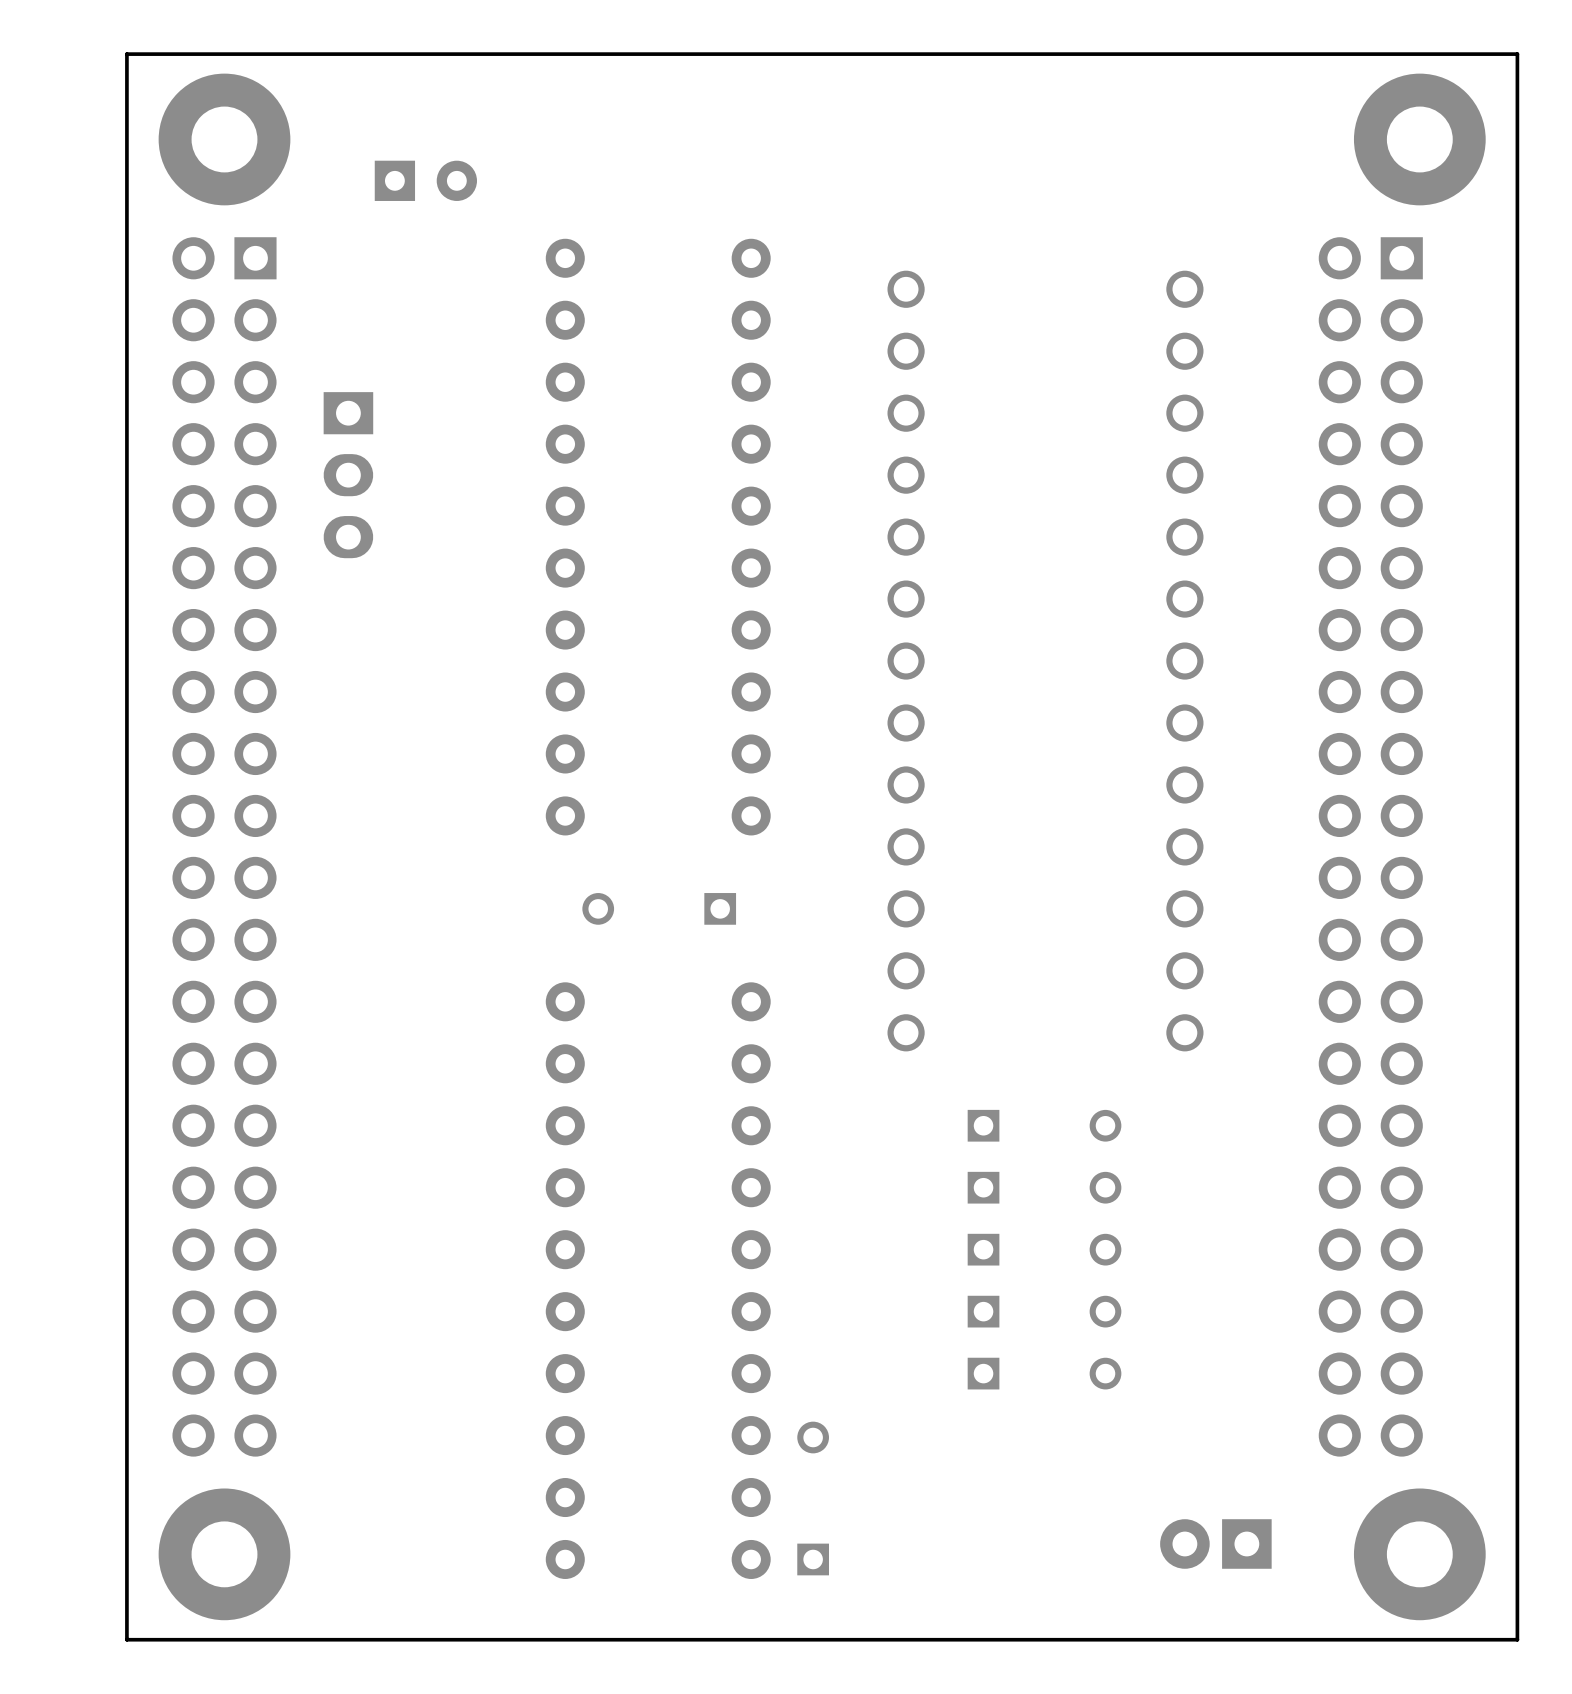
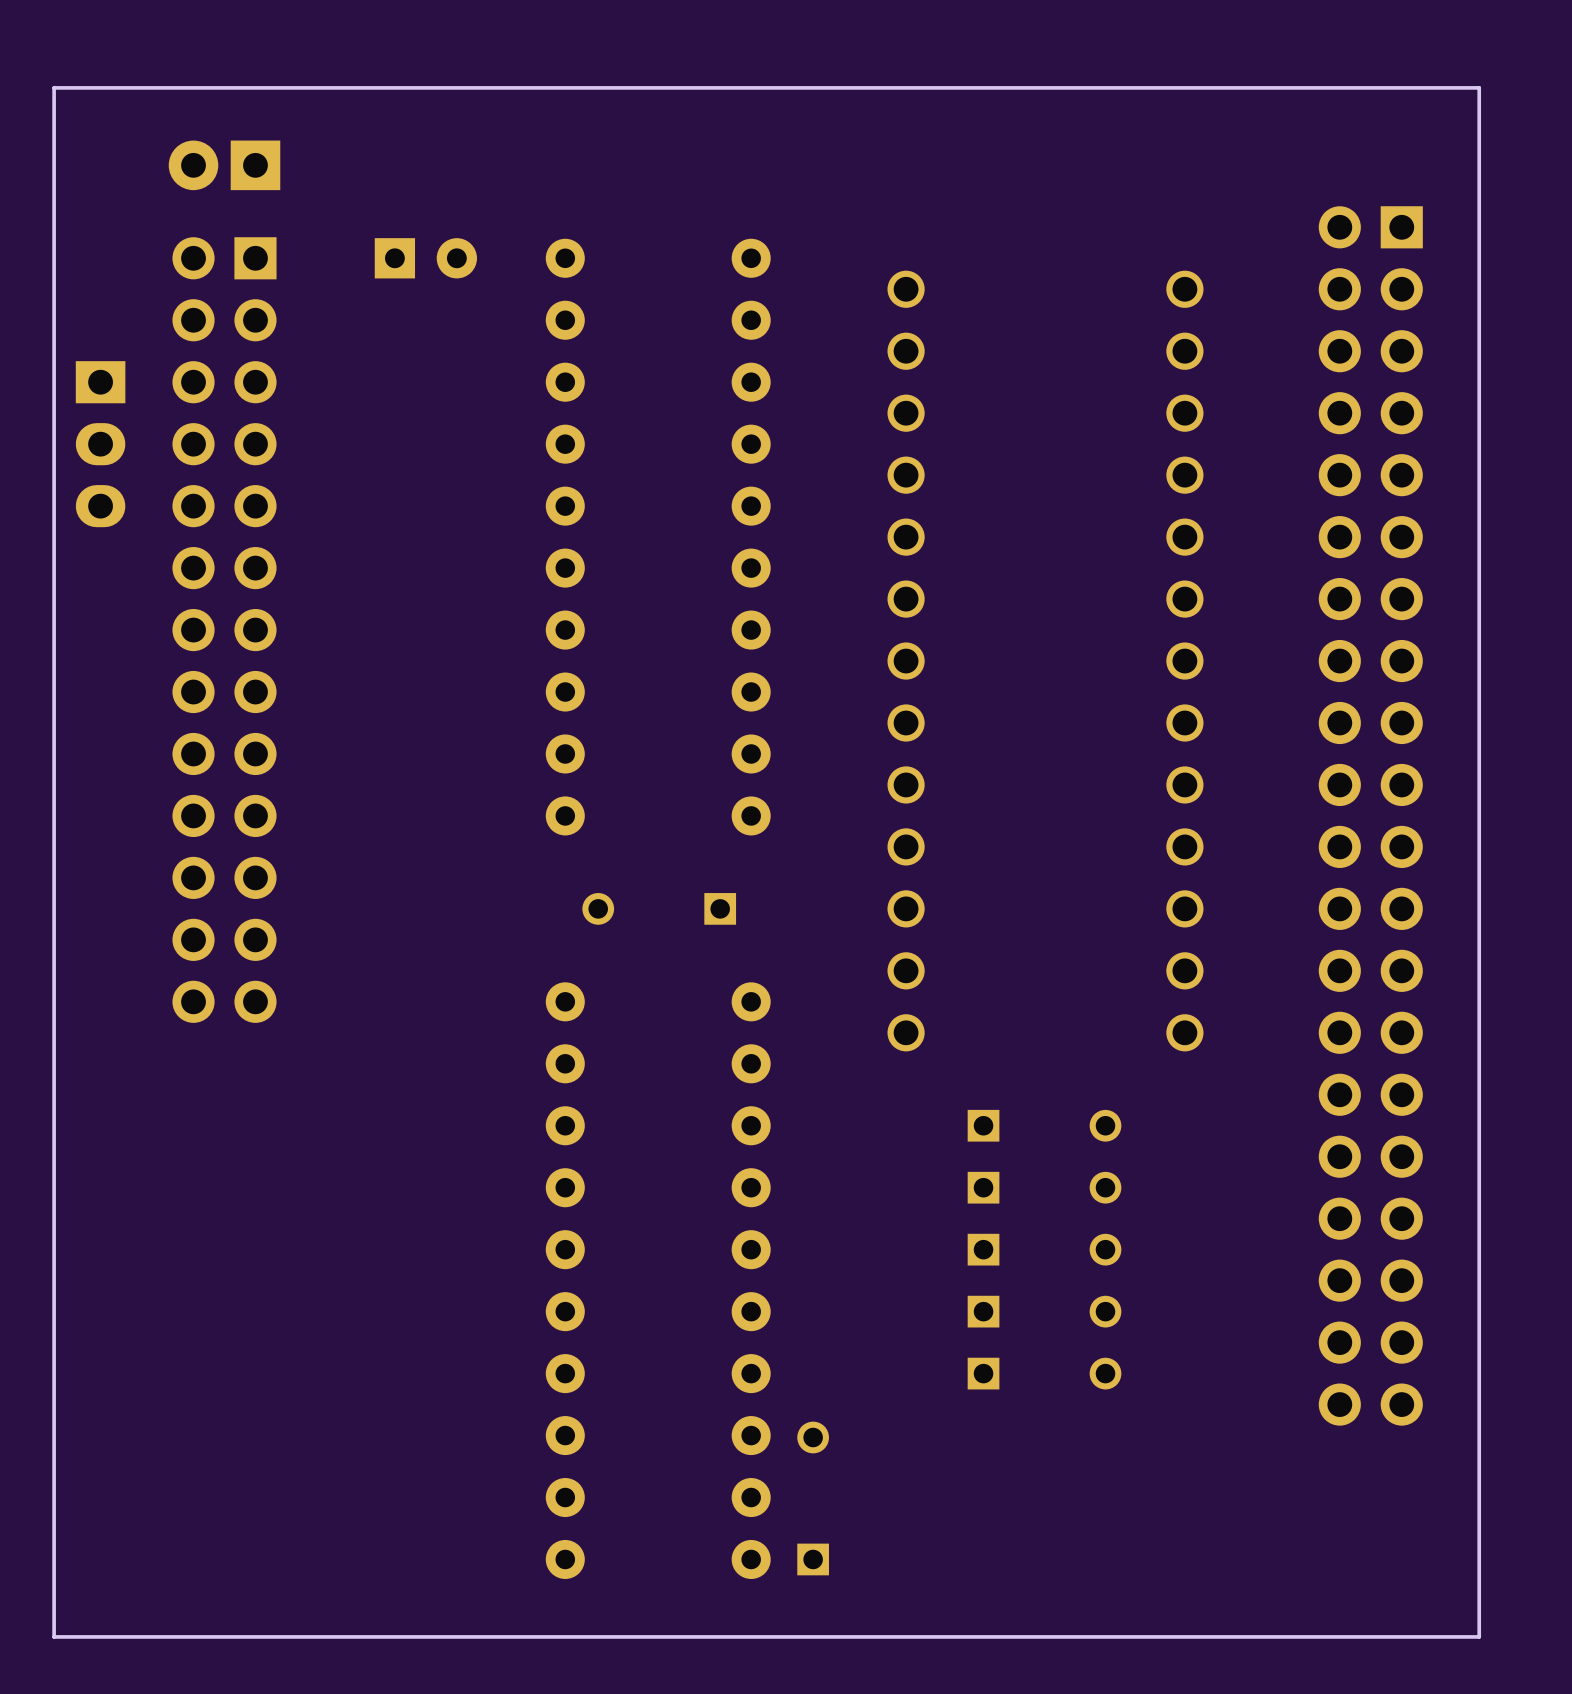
board edge: (1517, 54) (126, 54) (126, 1639) (1517, 1639) (1517, 54) -> (1479, 87) (1479, 1636) (54, 1636) (54, 87) (1479, 87)
part: (224, 139) -> none
part: (1419, 139) -> none
part: none -> (224, 165)
part position: (425, 180) -> (425, 258)
part position: (348, 475) -> (100, 444)
part: (224, 846) -> none
part position: (1370, 846) -> (1370, 815)
part: (1215, 1543) -> none
part: (224, 1554) -> none
part: (1419, 1554) -> none

